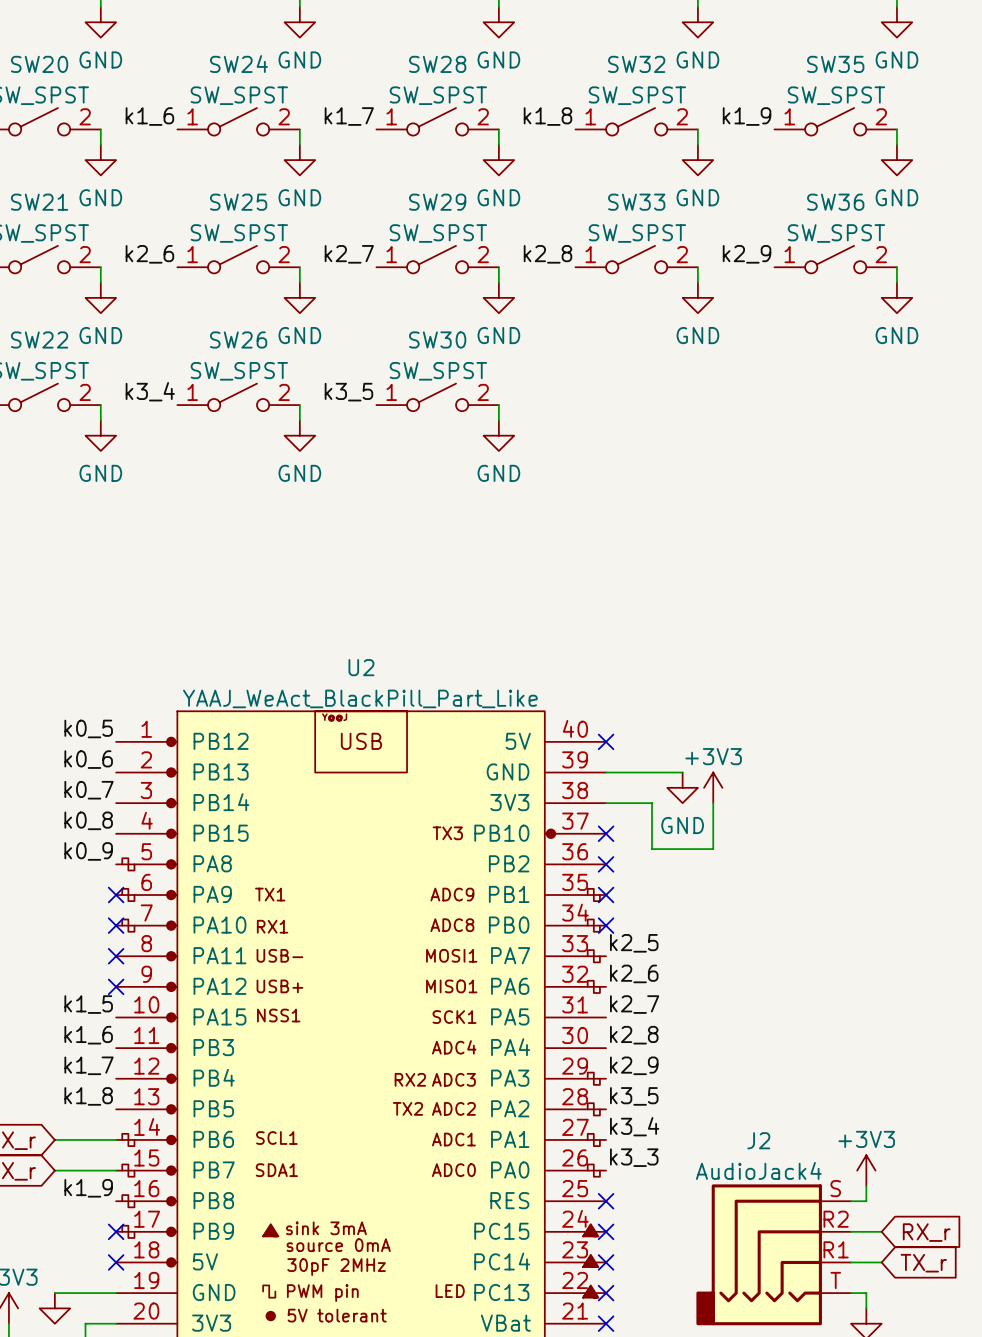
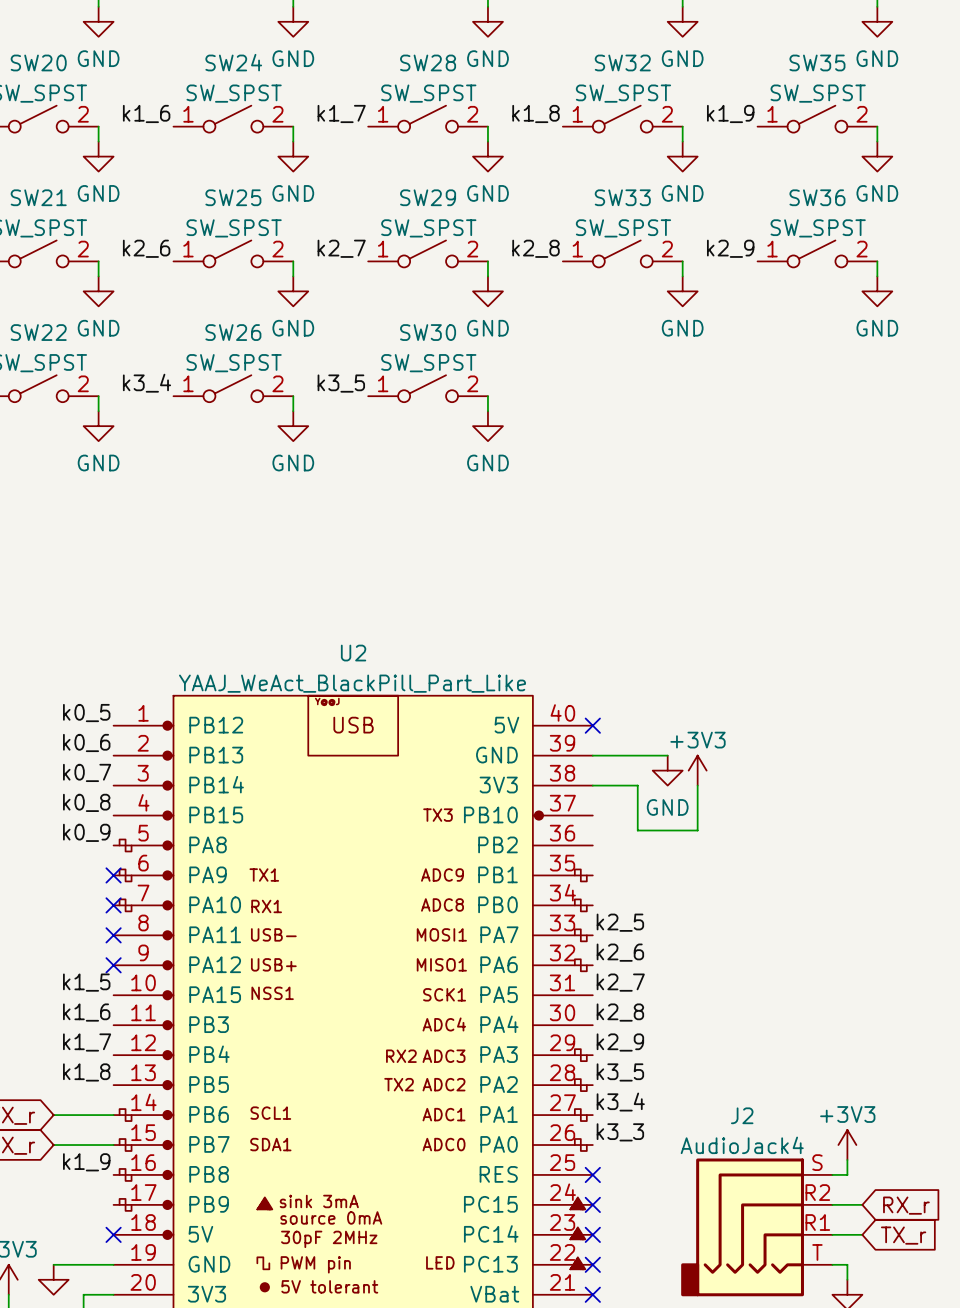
no-connect mark: (606, 833) -> none
no-connect mark: (606, 864) -> none
no-connect mark: (606, 895) -> none
no-connect mark: (606, 925) -> none
no-connect mark: (116, 1231) -> none

